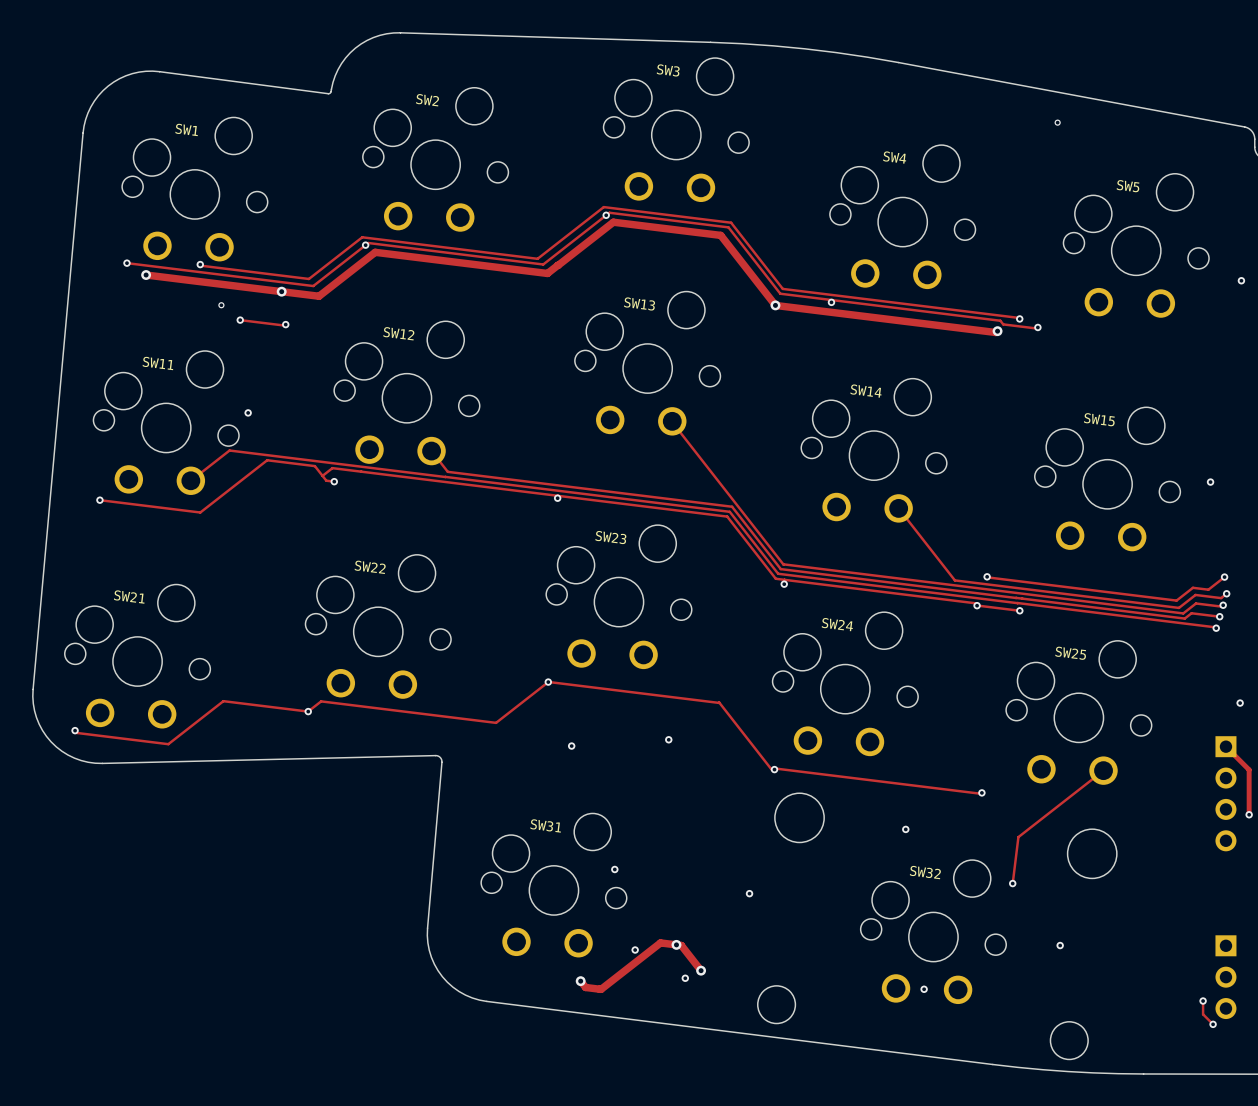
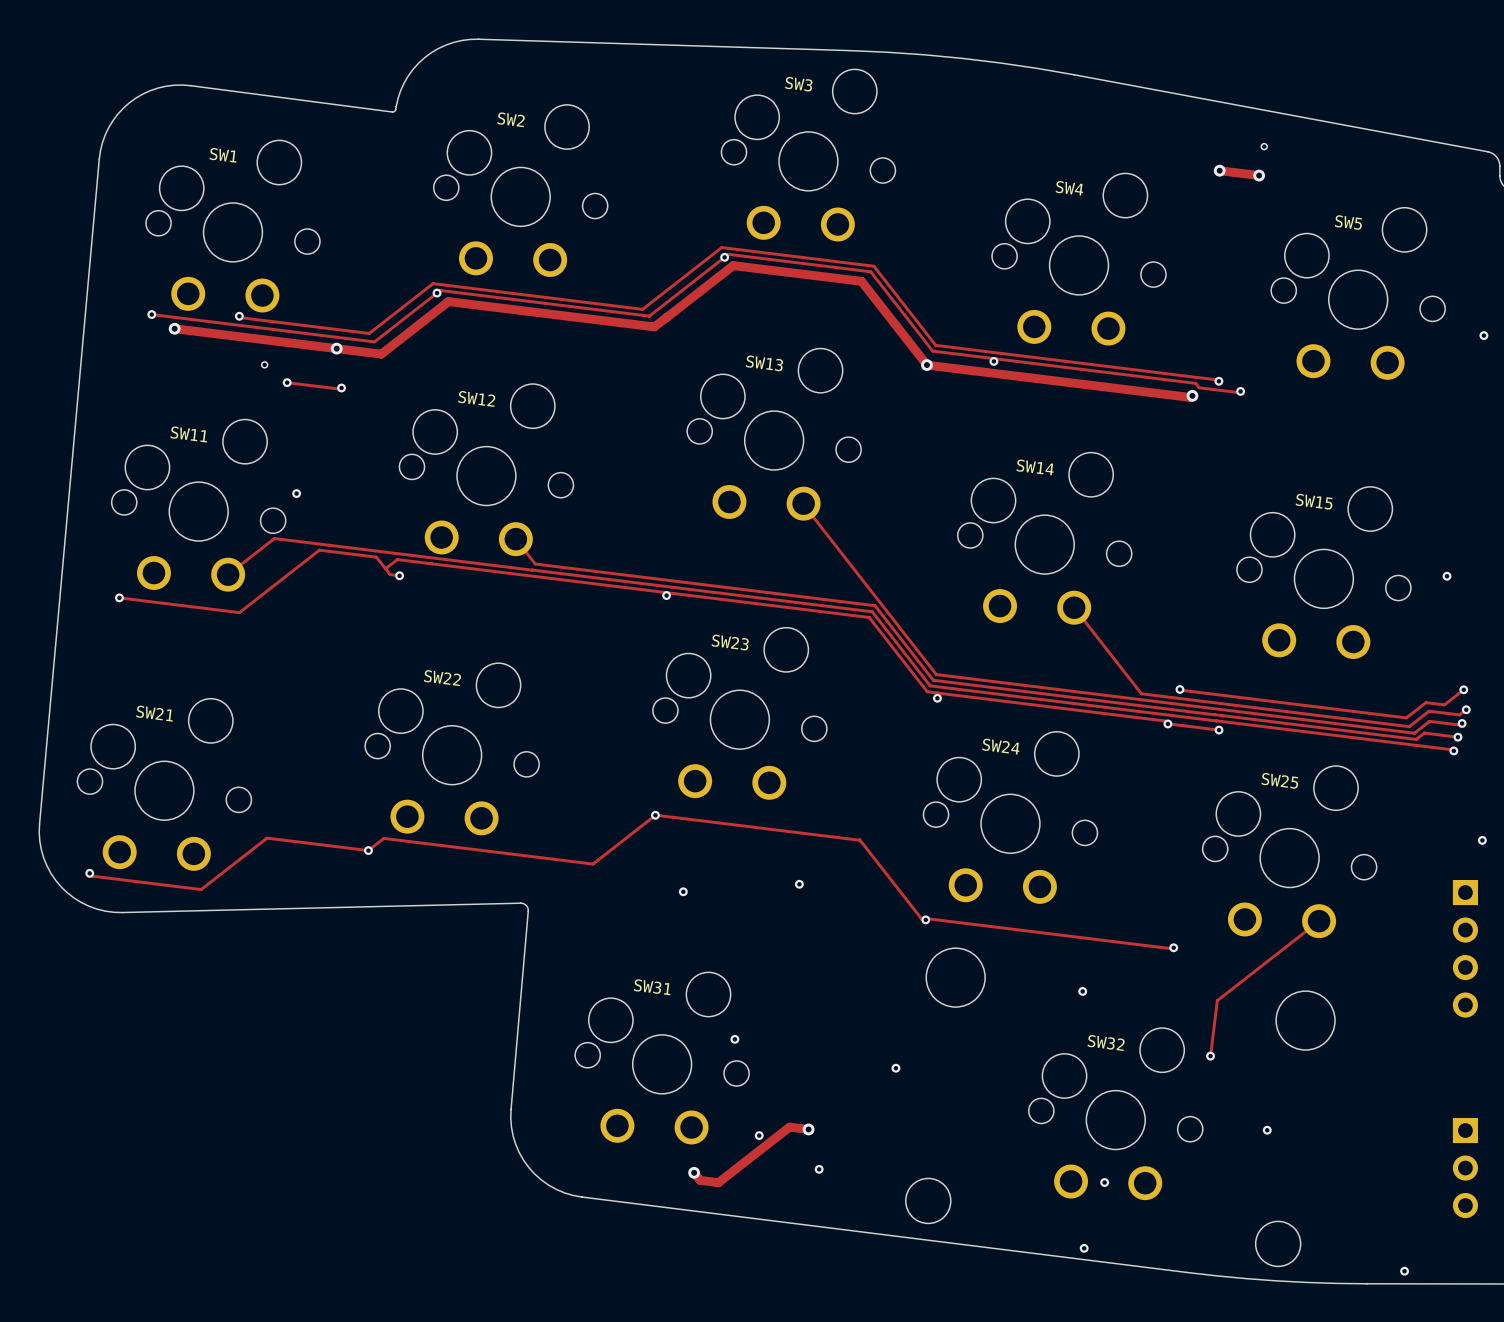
track: none -> (1219, 170) (1259, 175)
via: none -> (1219, 170)
via: none -> (1259, 175)
track: (1225, 746) (1249, 769) (1249, 814) -> none
via: (1249, 814) -> none
track: (676, 944) (681, 945) (701, 970) -> none
via: (701, 970) -> none
track: (1203, 1001) (1203, 1014) (1213, 1024) -> none
via: (1203, 1001) -> none
via: (1213, 1024) -> none
via: none -> (1084, 1248)
via: none -> (1404, 1271)

